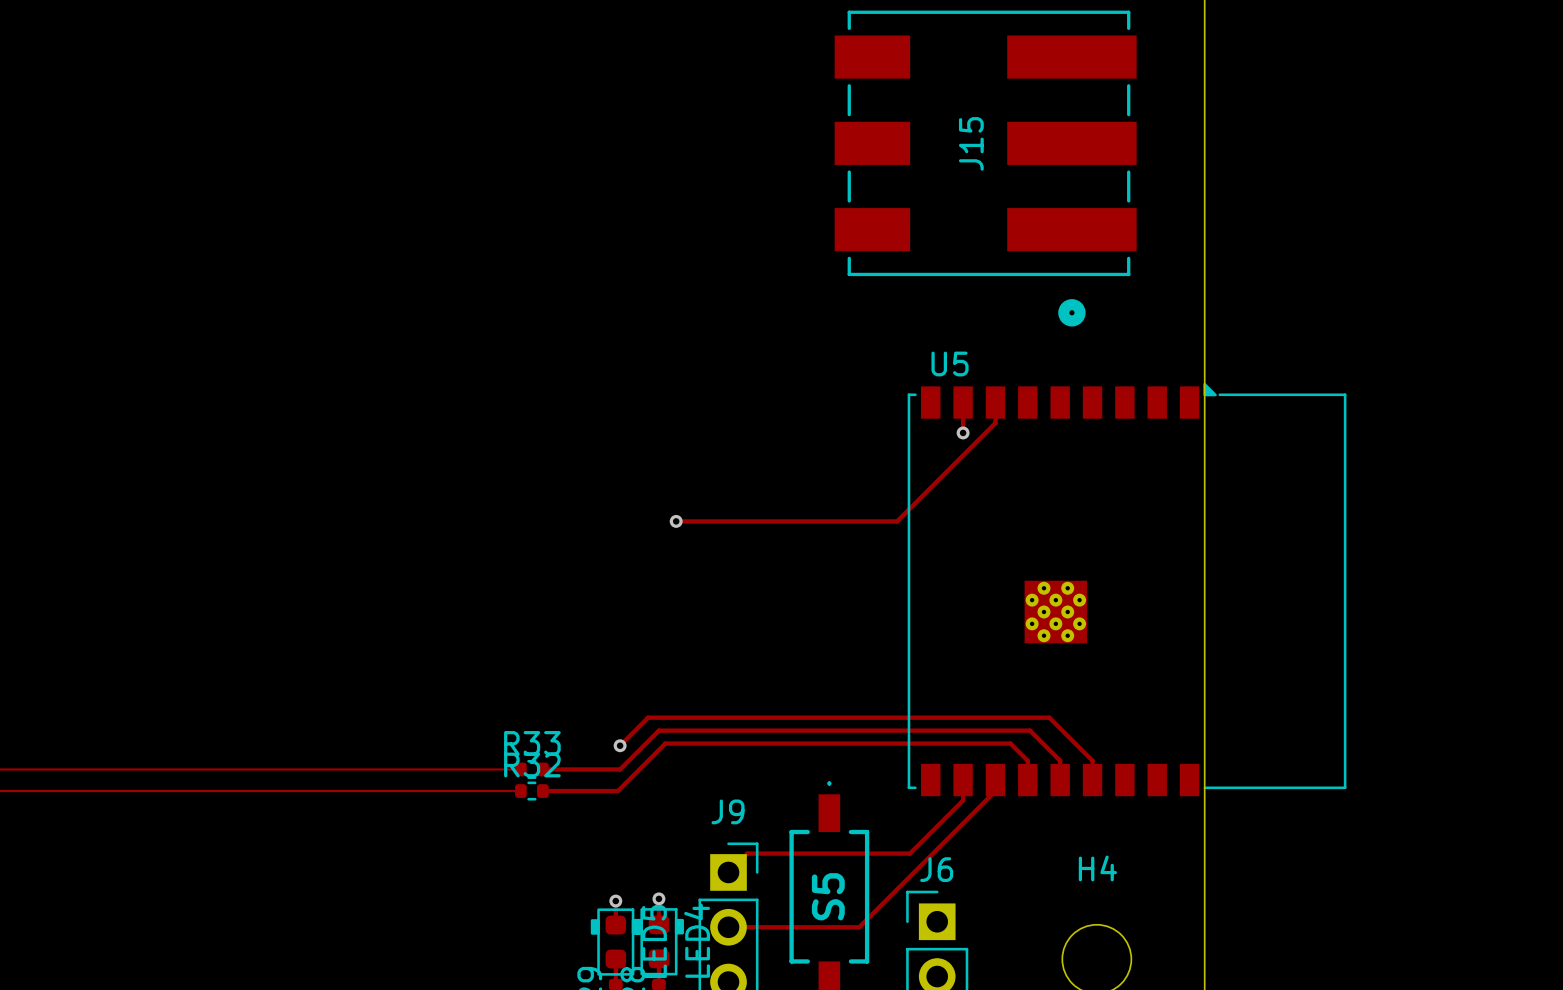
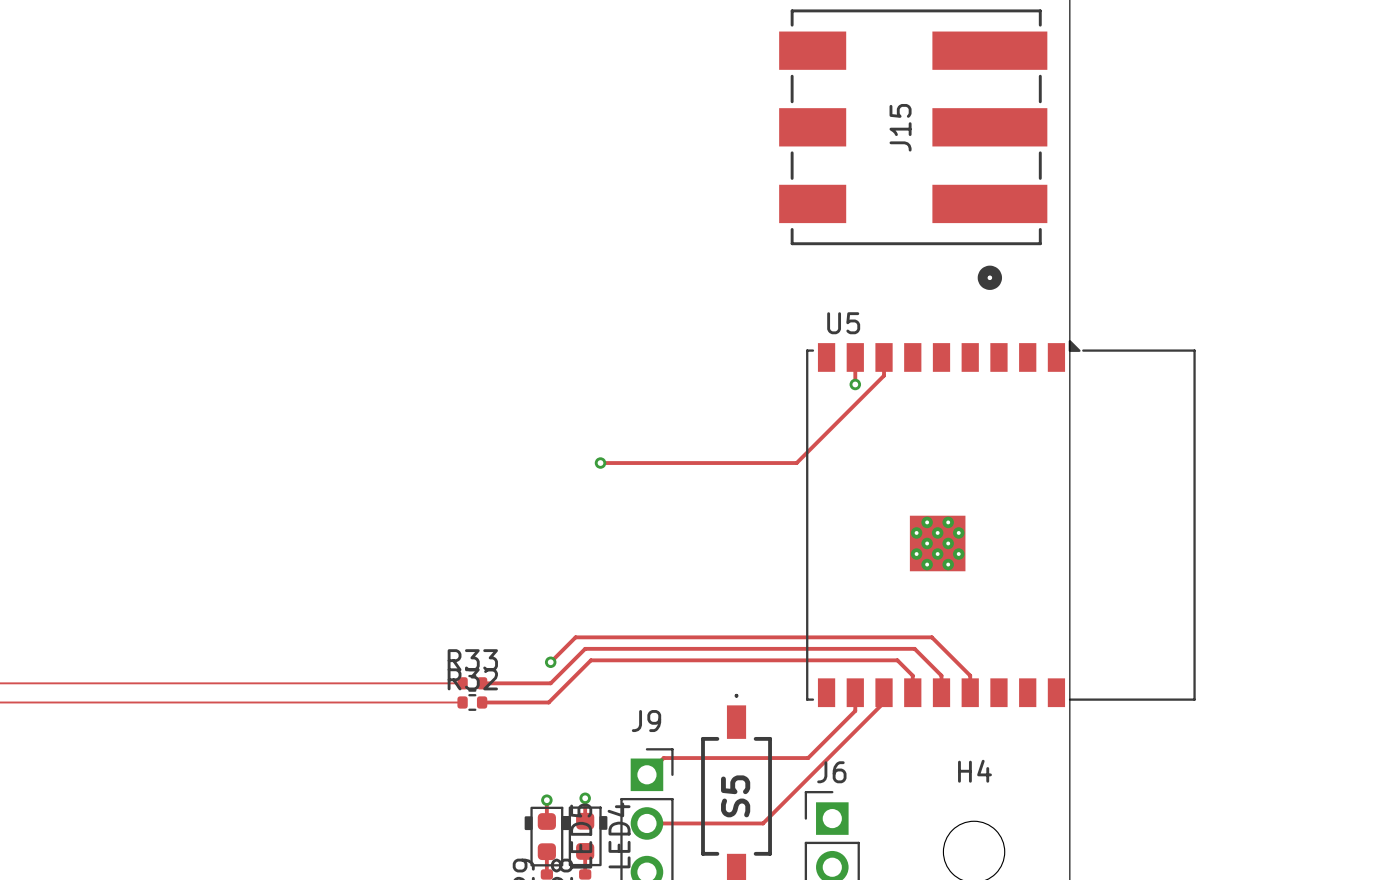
J15 position: (985, 168) -> (913, 149)

